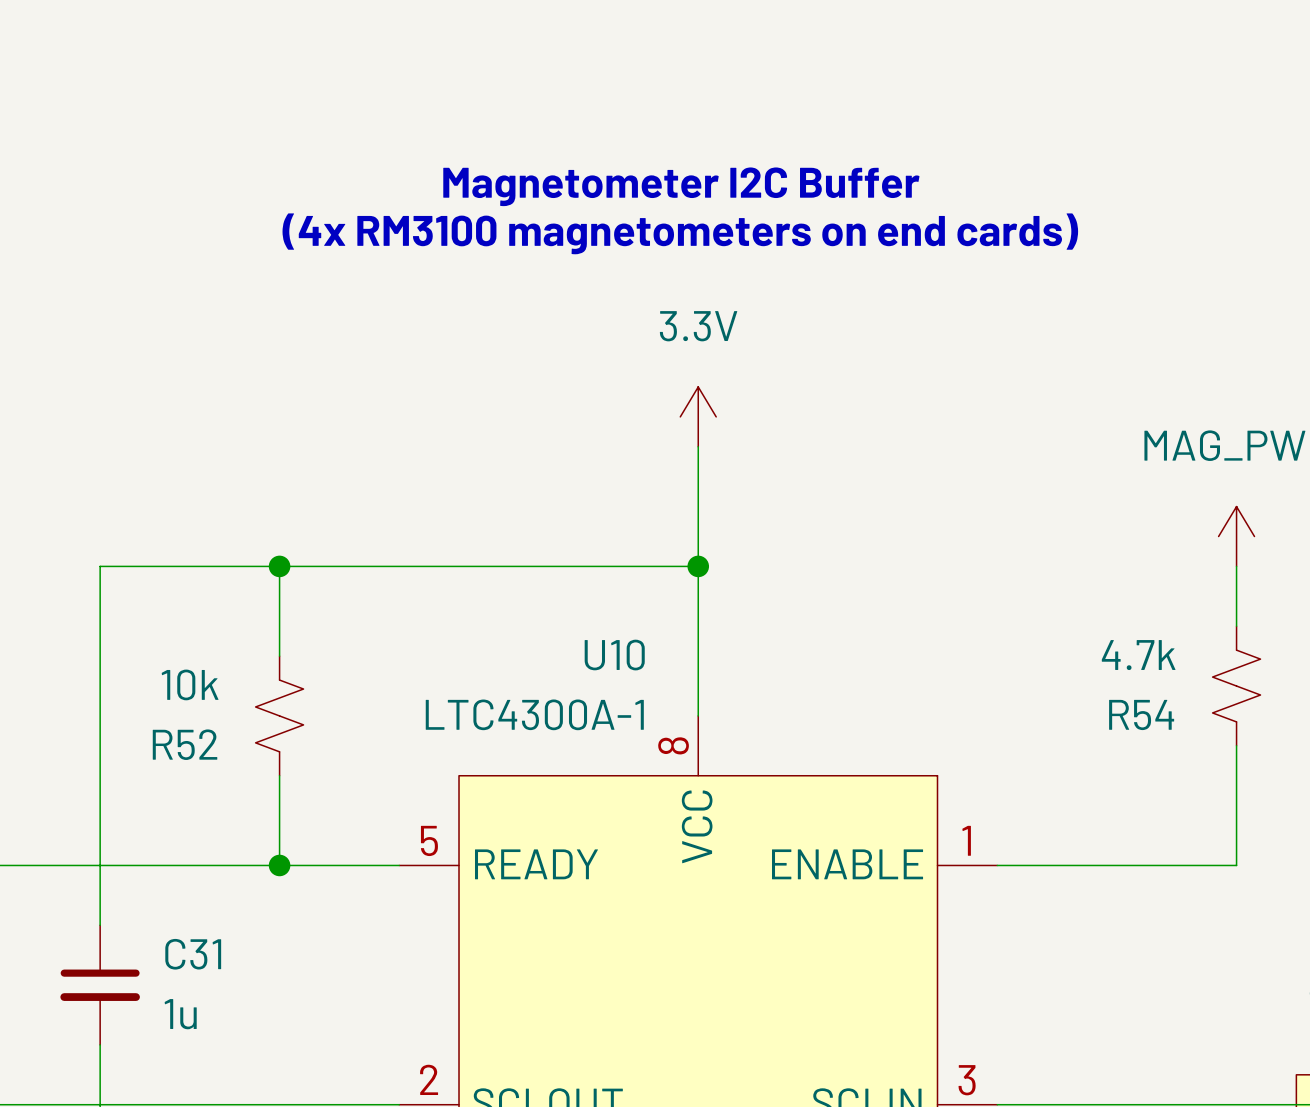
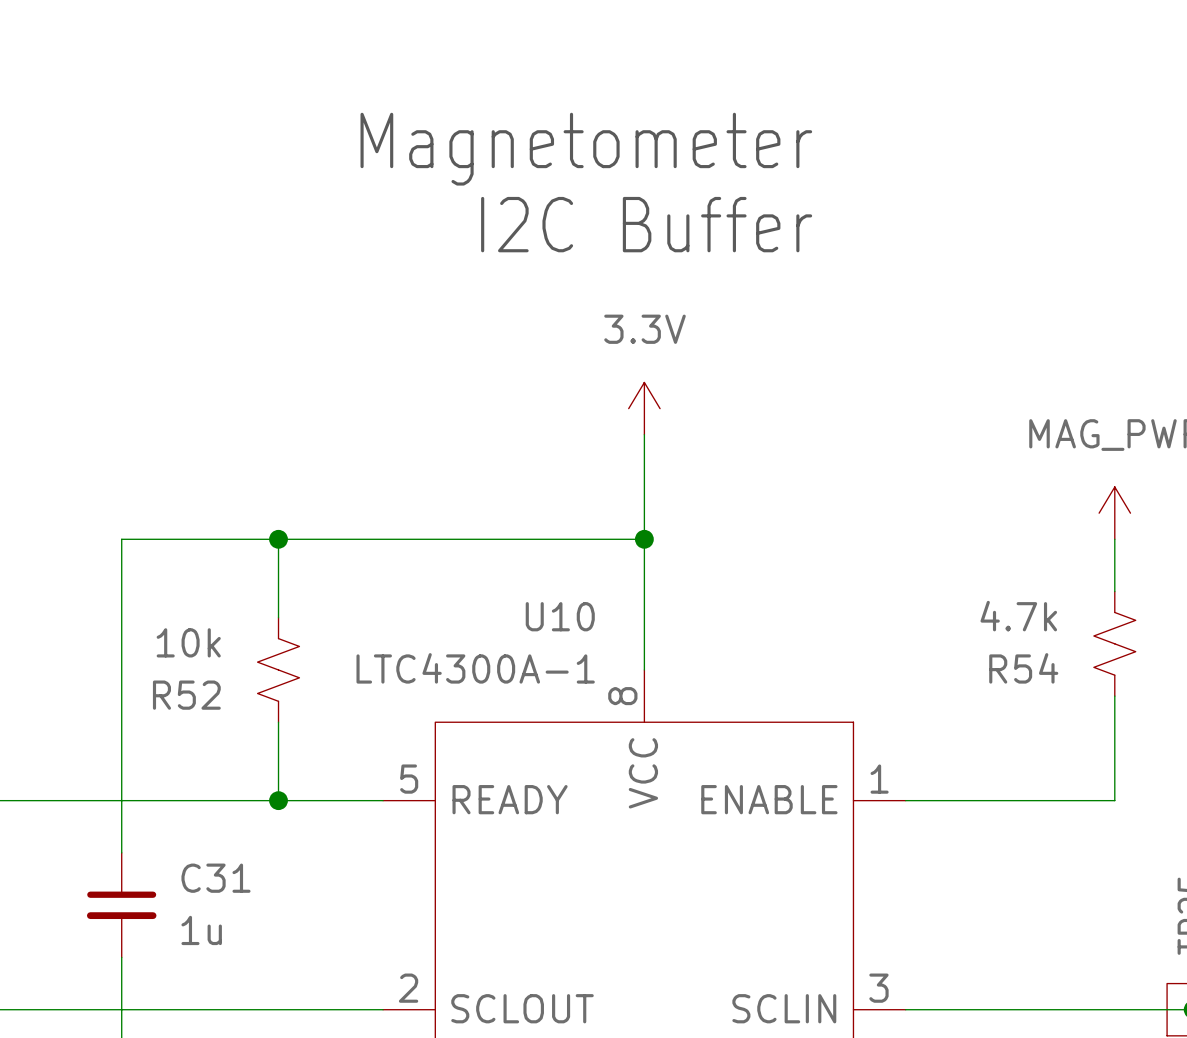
text: none -> Magnetometer (586, 149)
text: Magnetometer I2C Buffer (681, 186) -> none
text: none -> I2C Buffer (646, 224)
text: (4x RM3100 magnetometers on end cards) (680, 233) -> none

